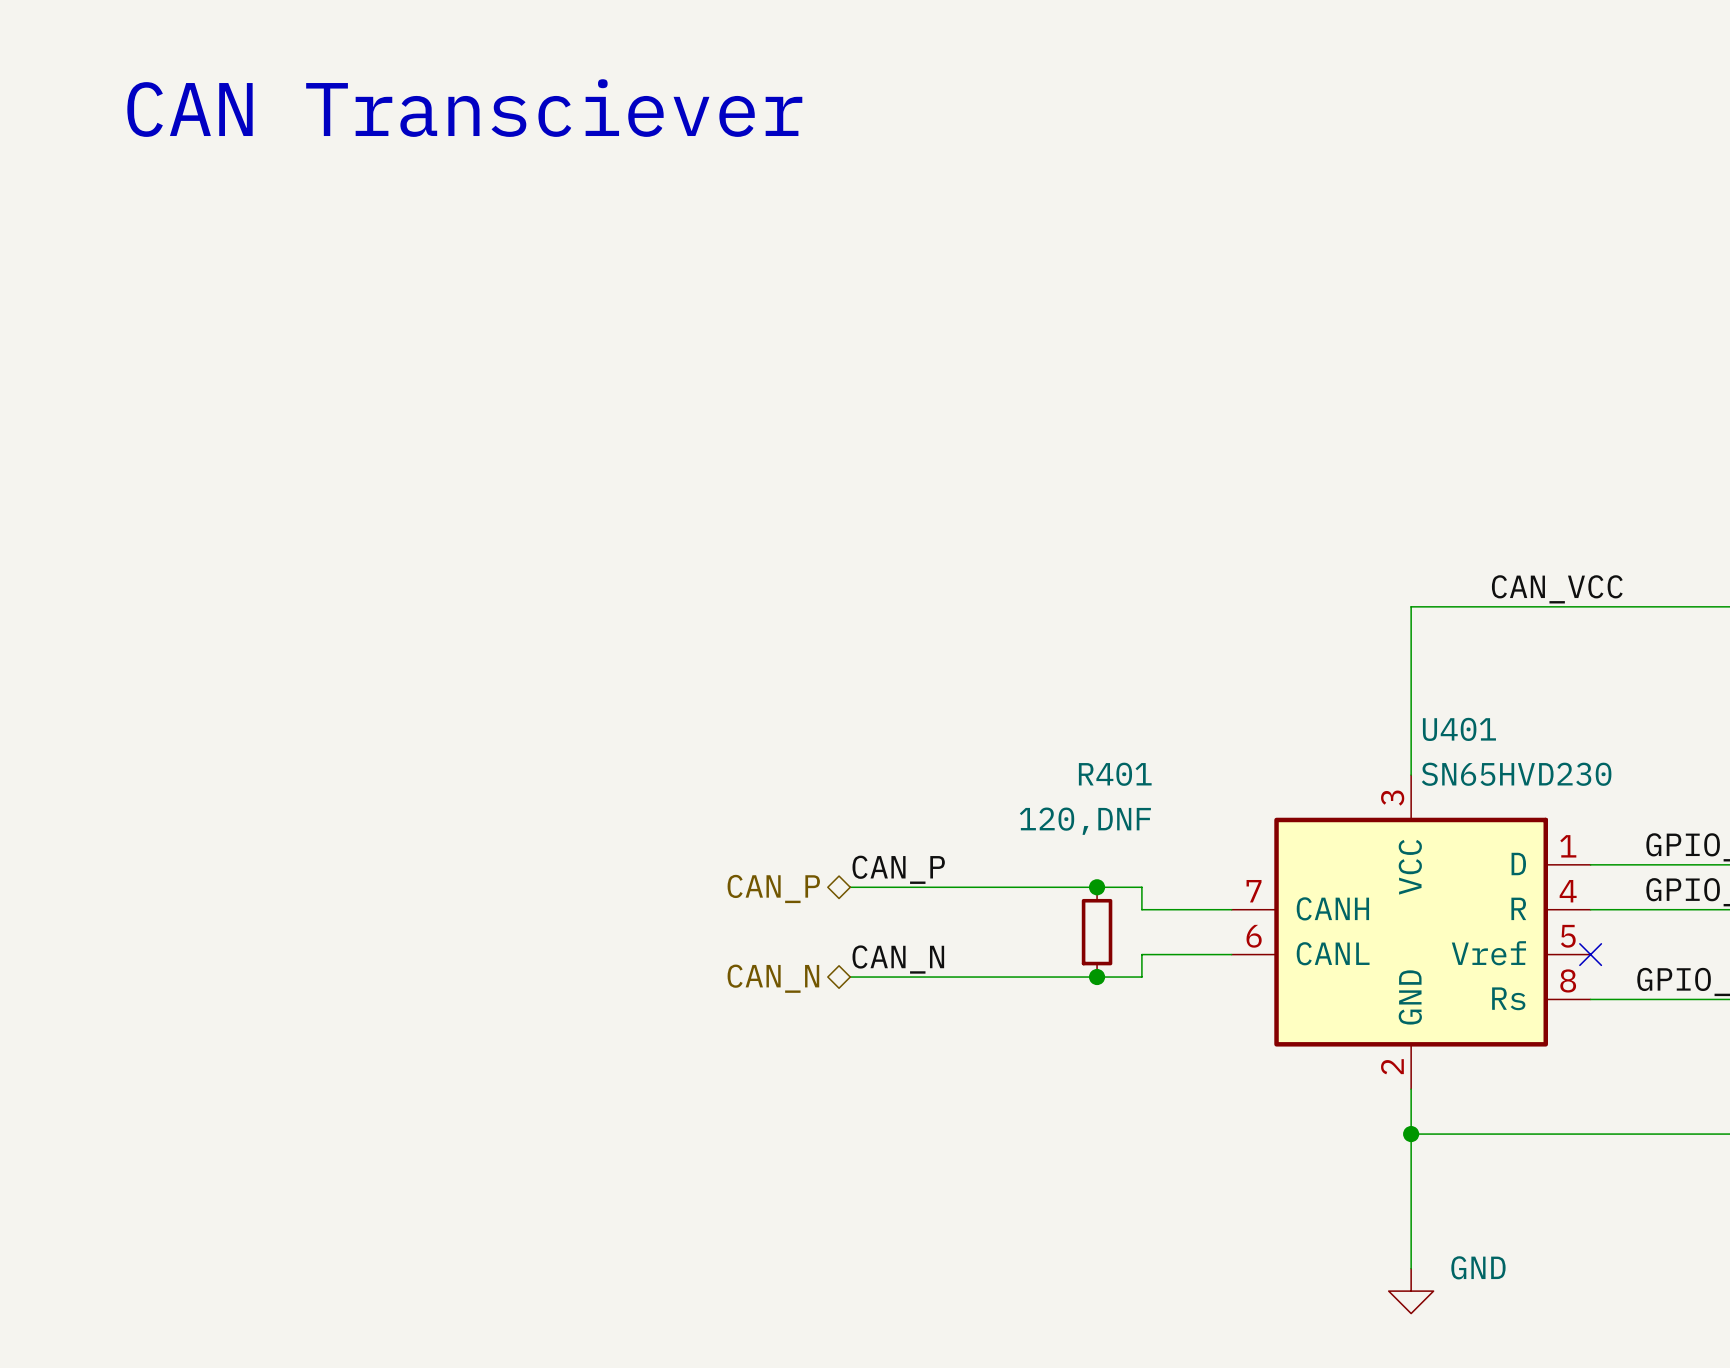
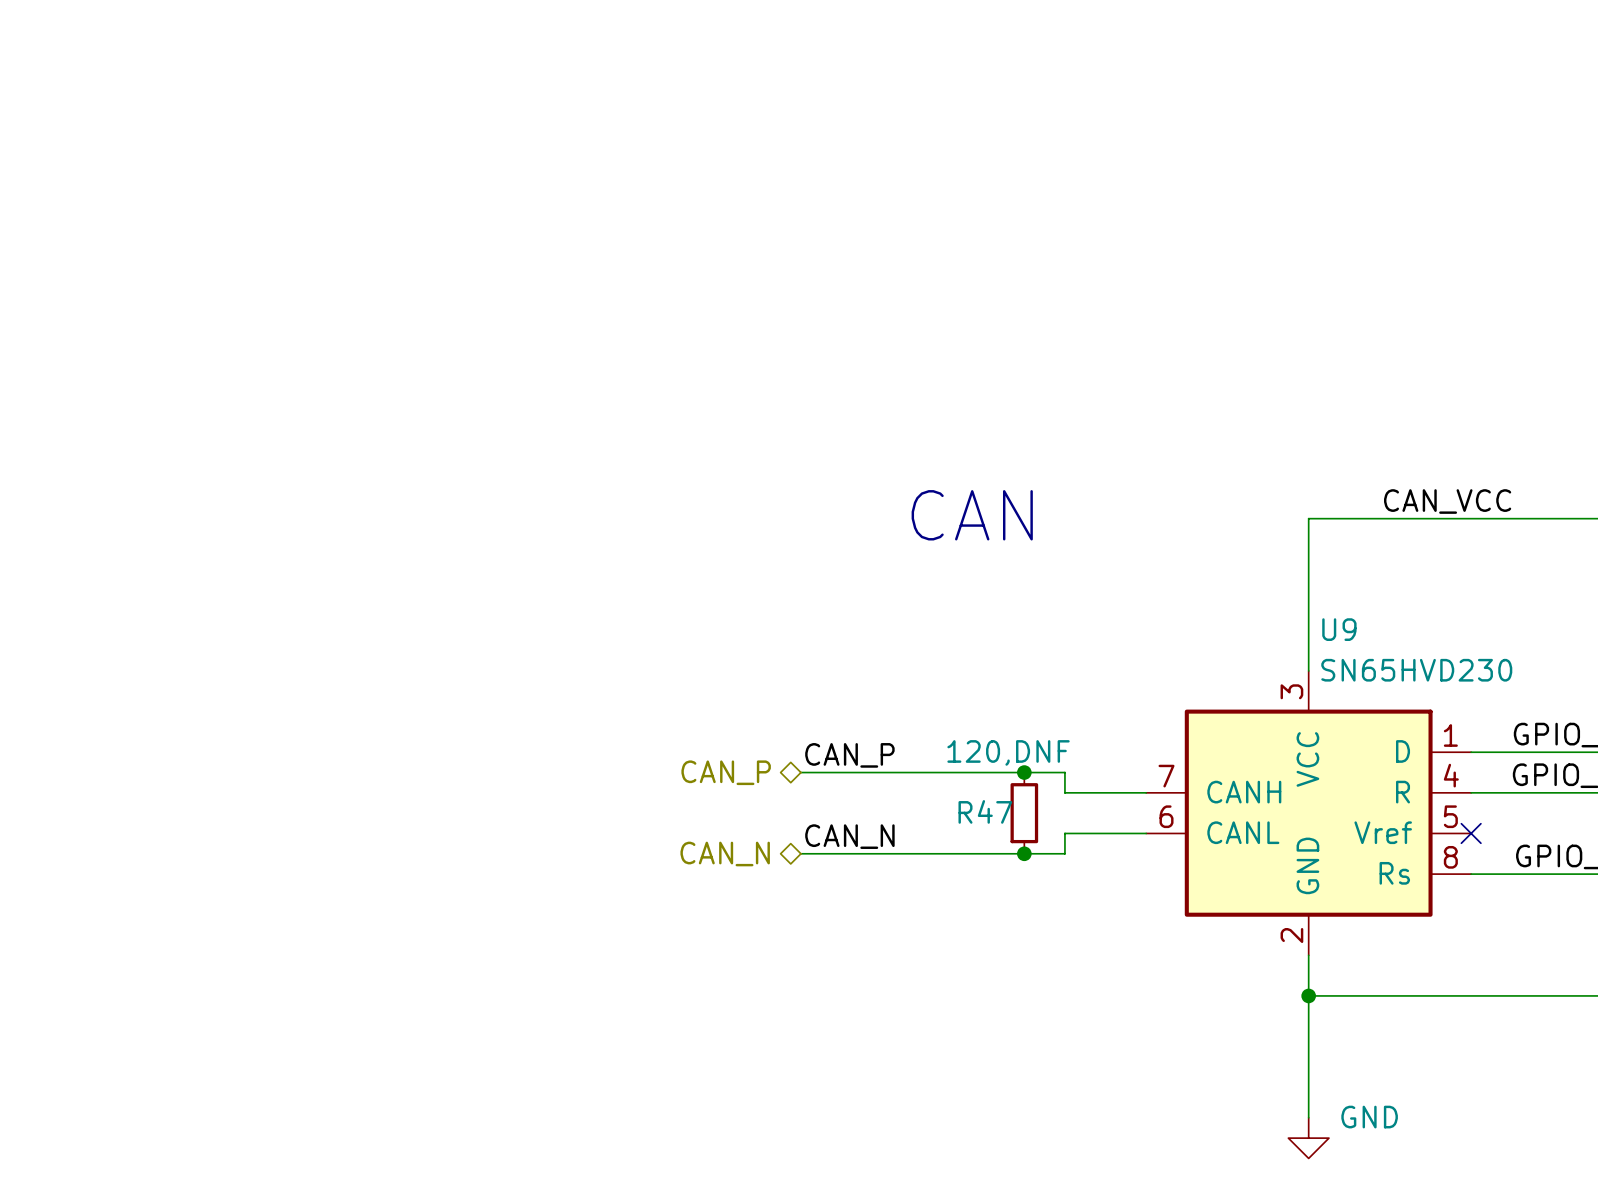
text: CAN Transciever (464, 108) -> none
text: none -> CAN (972, 515)
U401 name: U401 (1459, 729) -> U9 (1339, 629)
R401 name: R401 (1115, 774) -> R47 (985, 811)
R401 value position: 120,DNF (1085, 821) -> 120,DNF (1008, 752)

